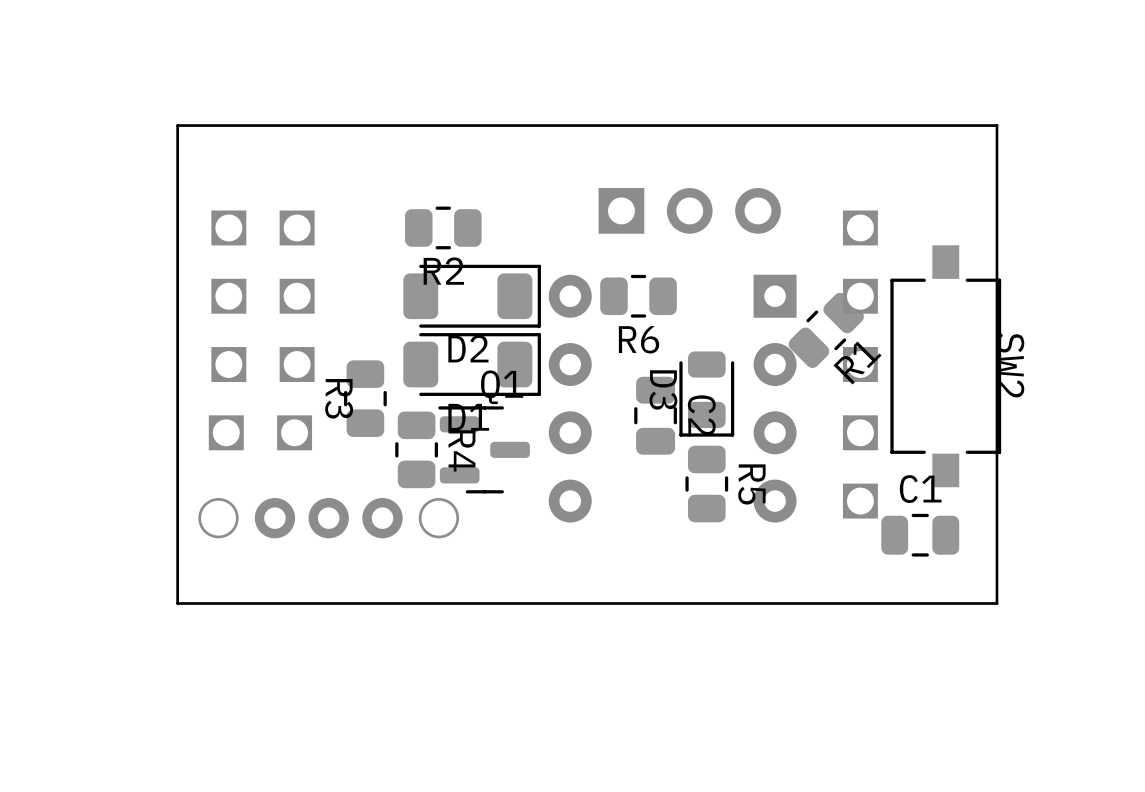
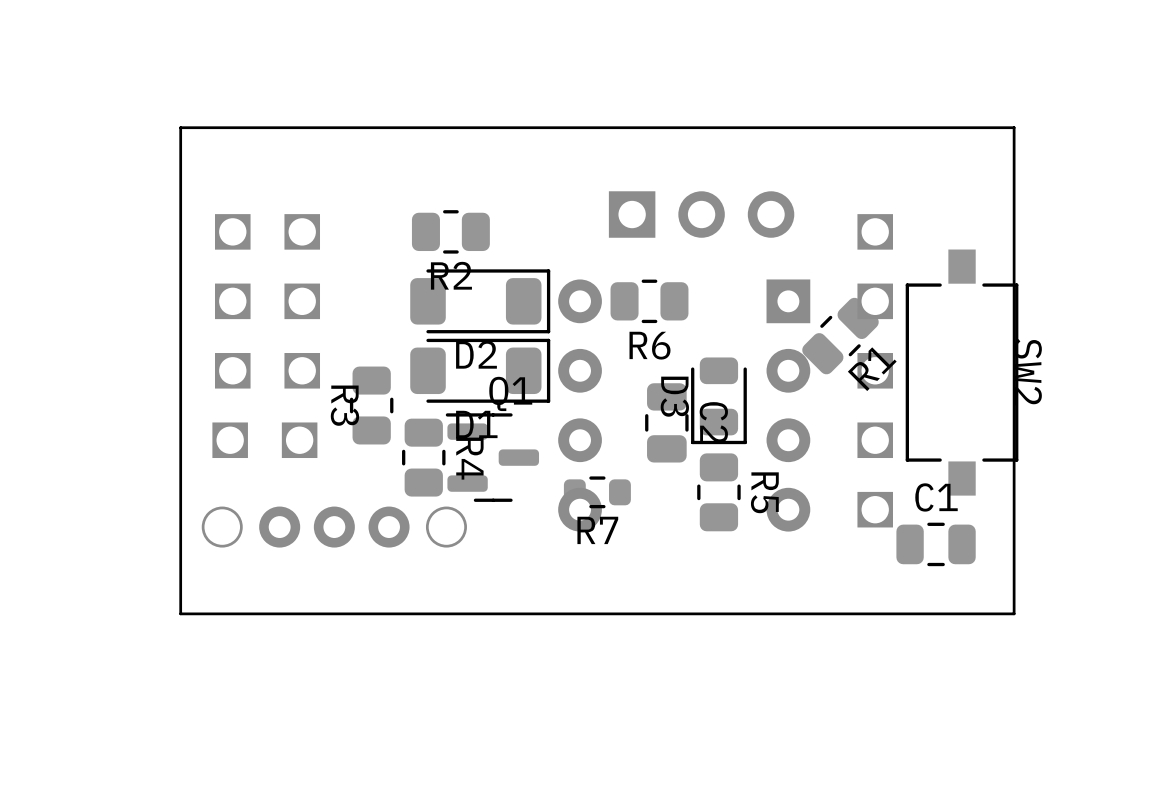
R7: none -> (597, 492)

